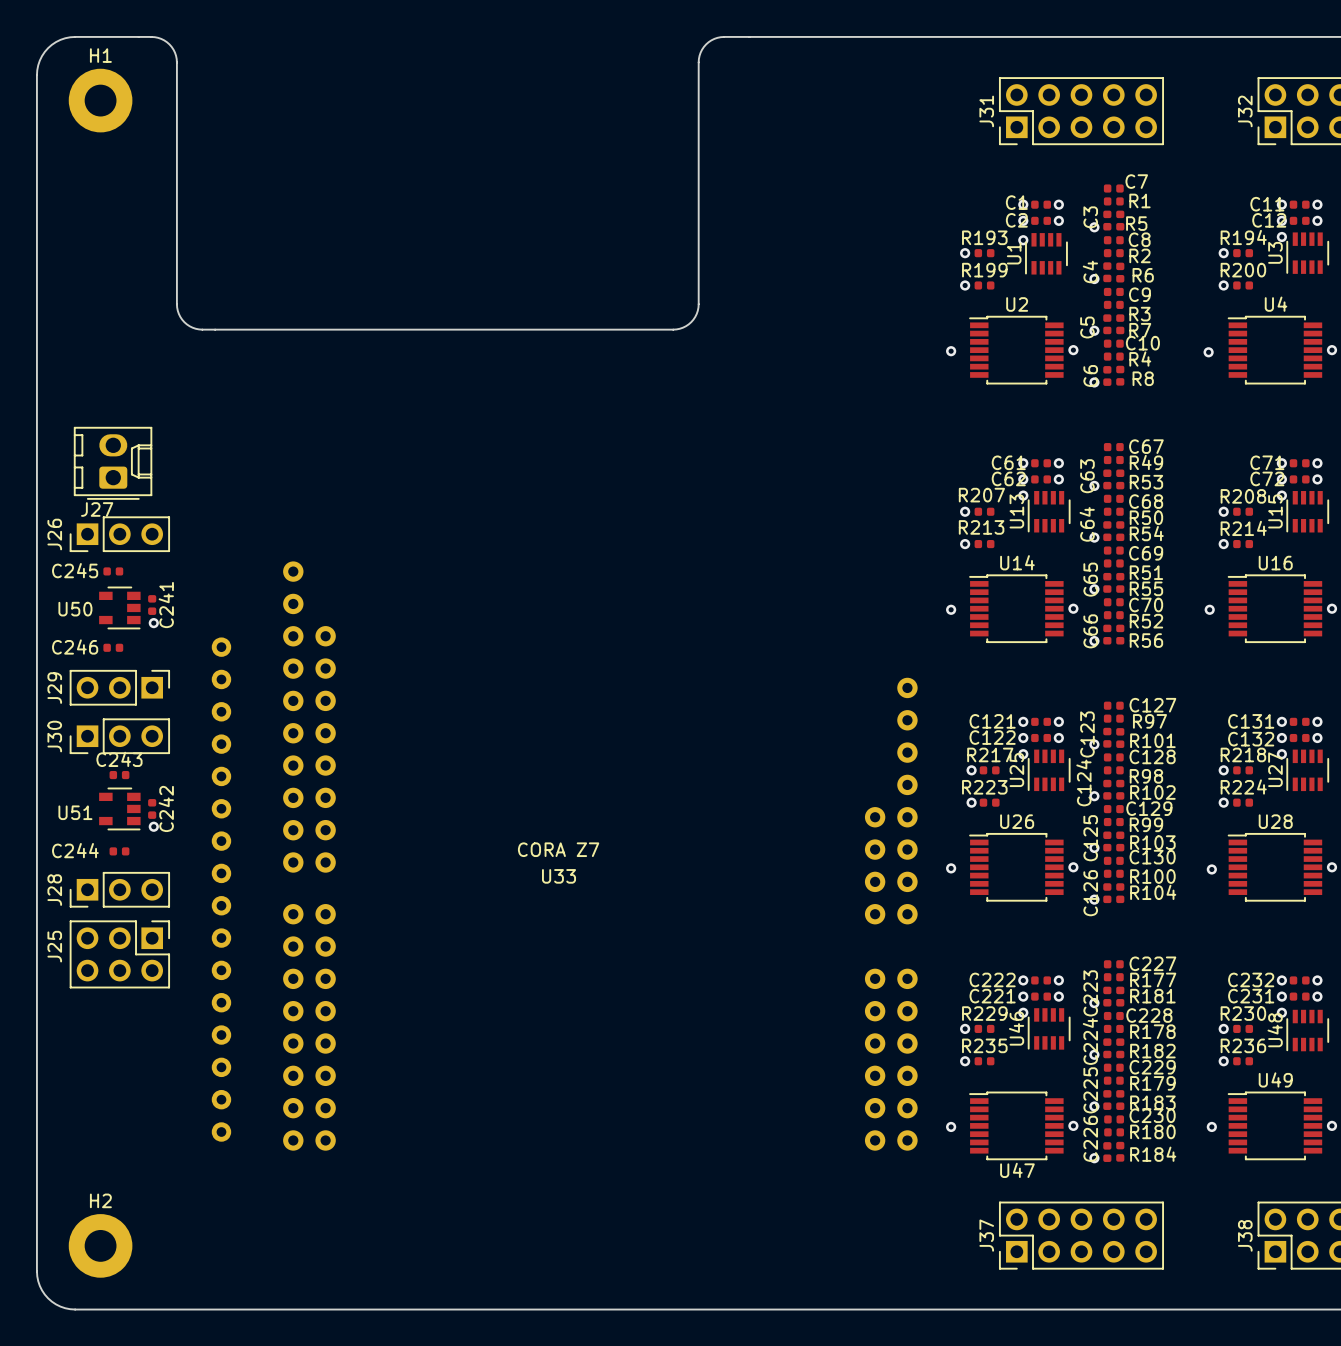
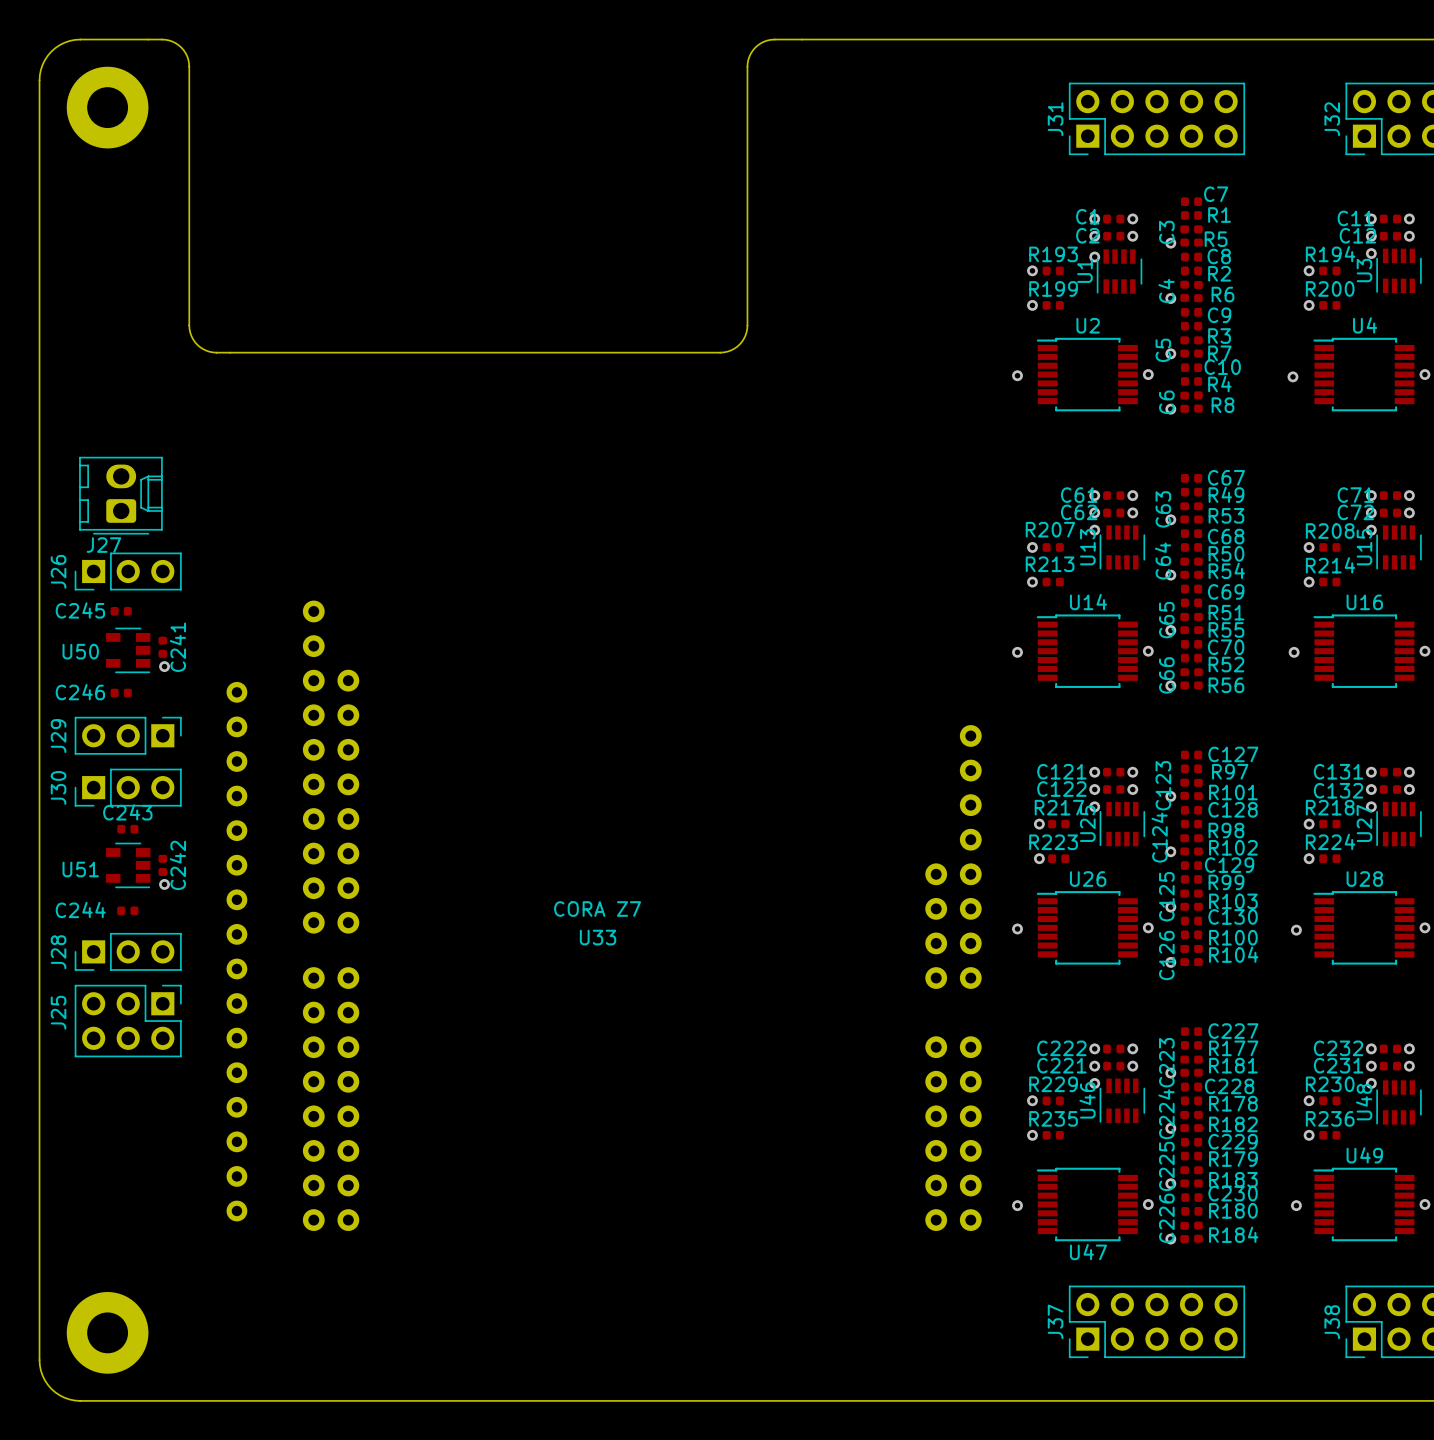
H1: (100, 100) -> none
part: none -> (107, 107)
H2: (100, 1245) -> none
part: none -> (107, 1332)

